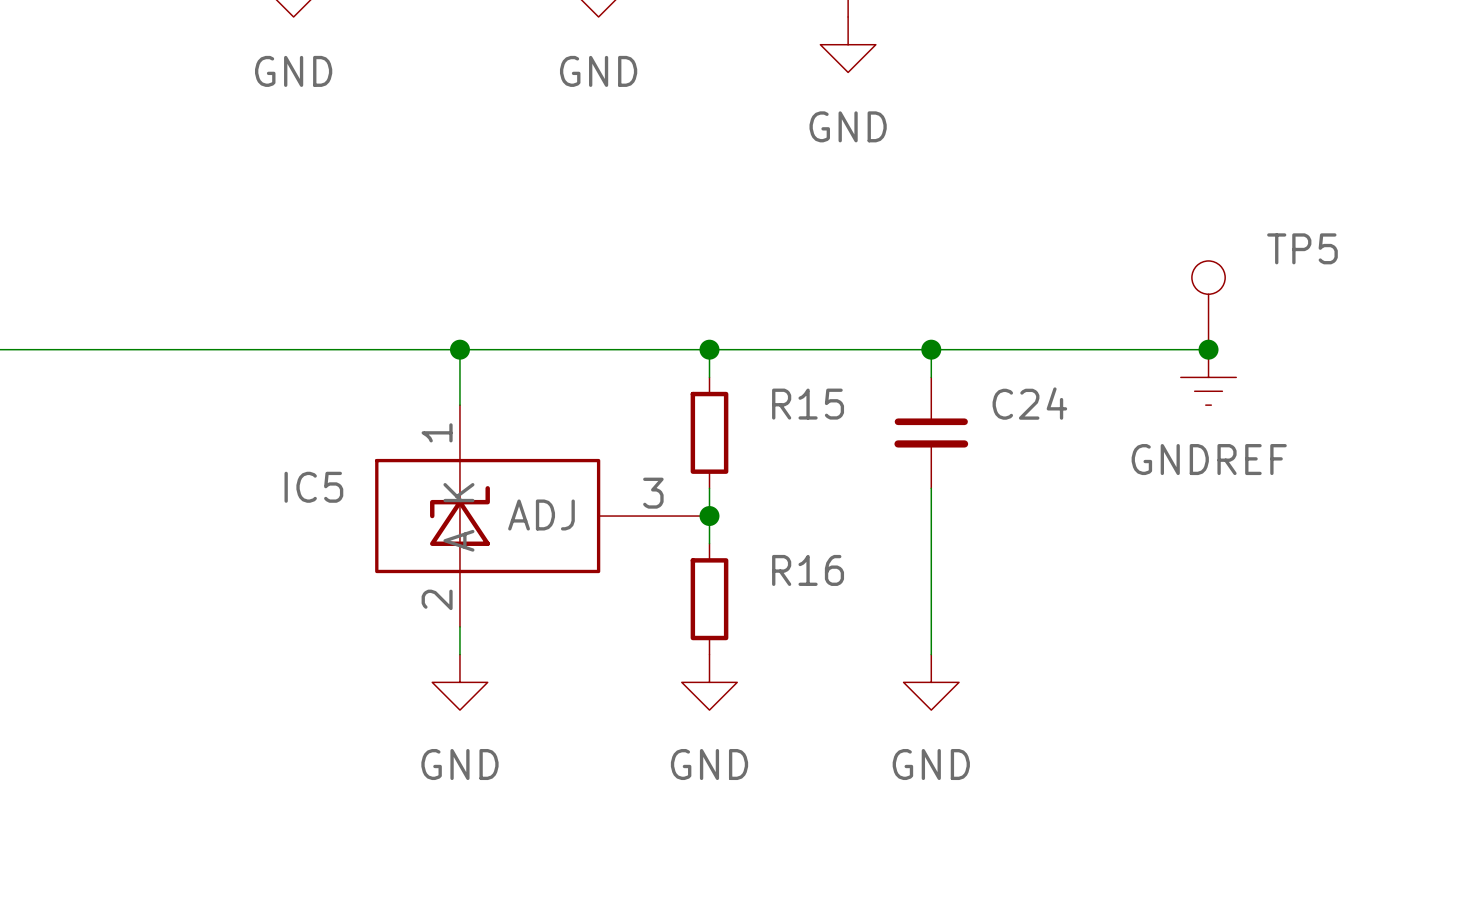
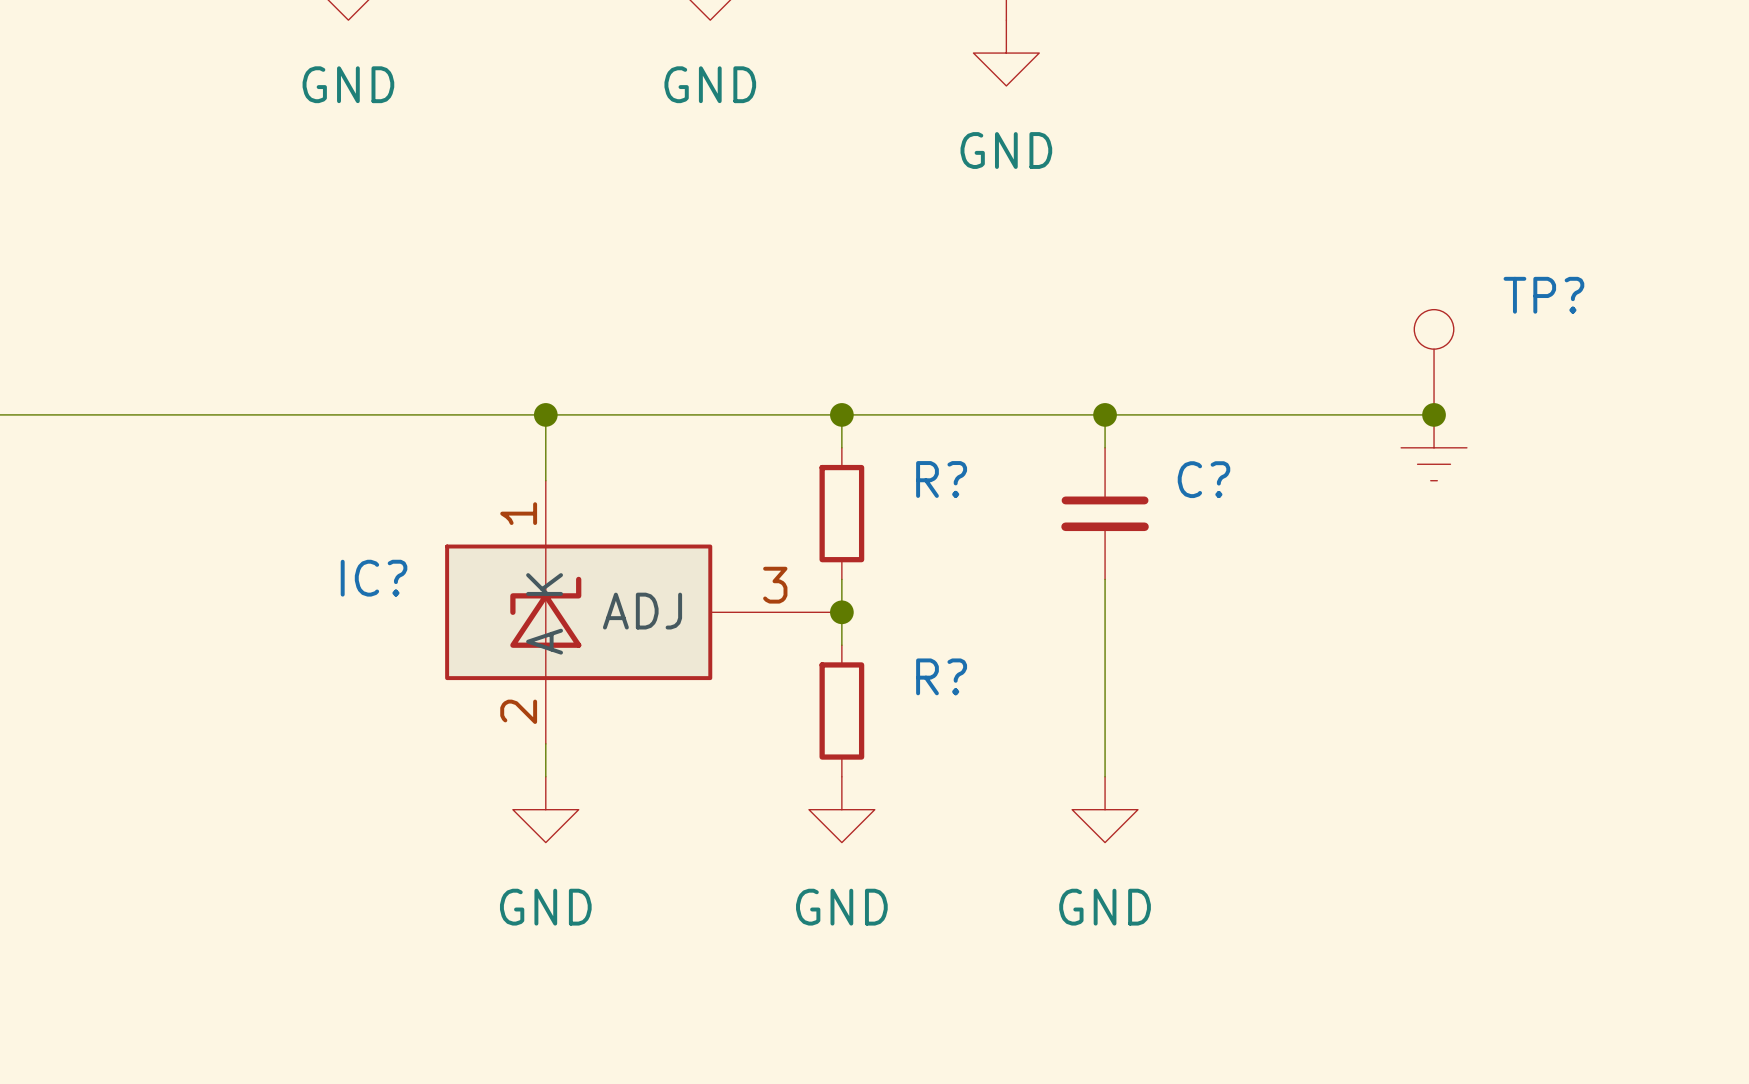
TP5 name: TP5 (1302, 248) -> TP? (1543, 295)
C24 name: C24 (1029, 403) -> C? (1203, 479)
R15 name: R15 (808, 404) -> R? (941, 479)
power symbol text: GNDREF (1209, 459) -> none
IC5 name: IC5 (313, 487) -> IC? (374, 578)
R16 name: R16 (808, 570) -> R? (941, 676)

